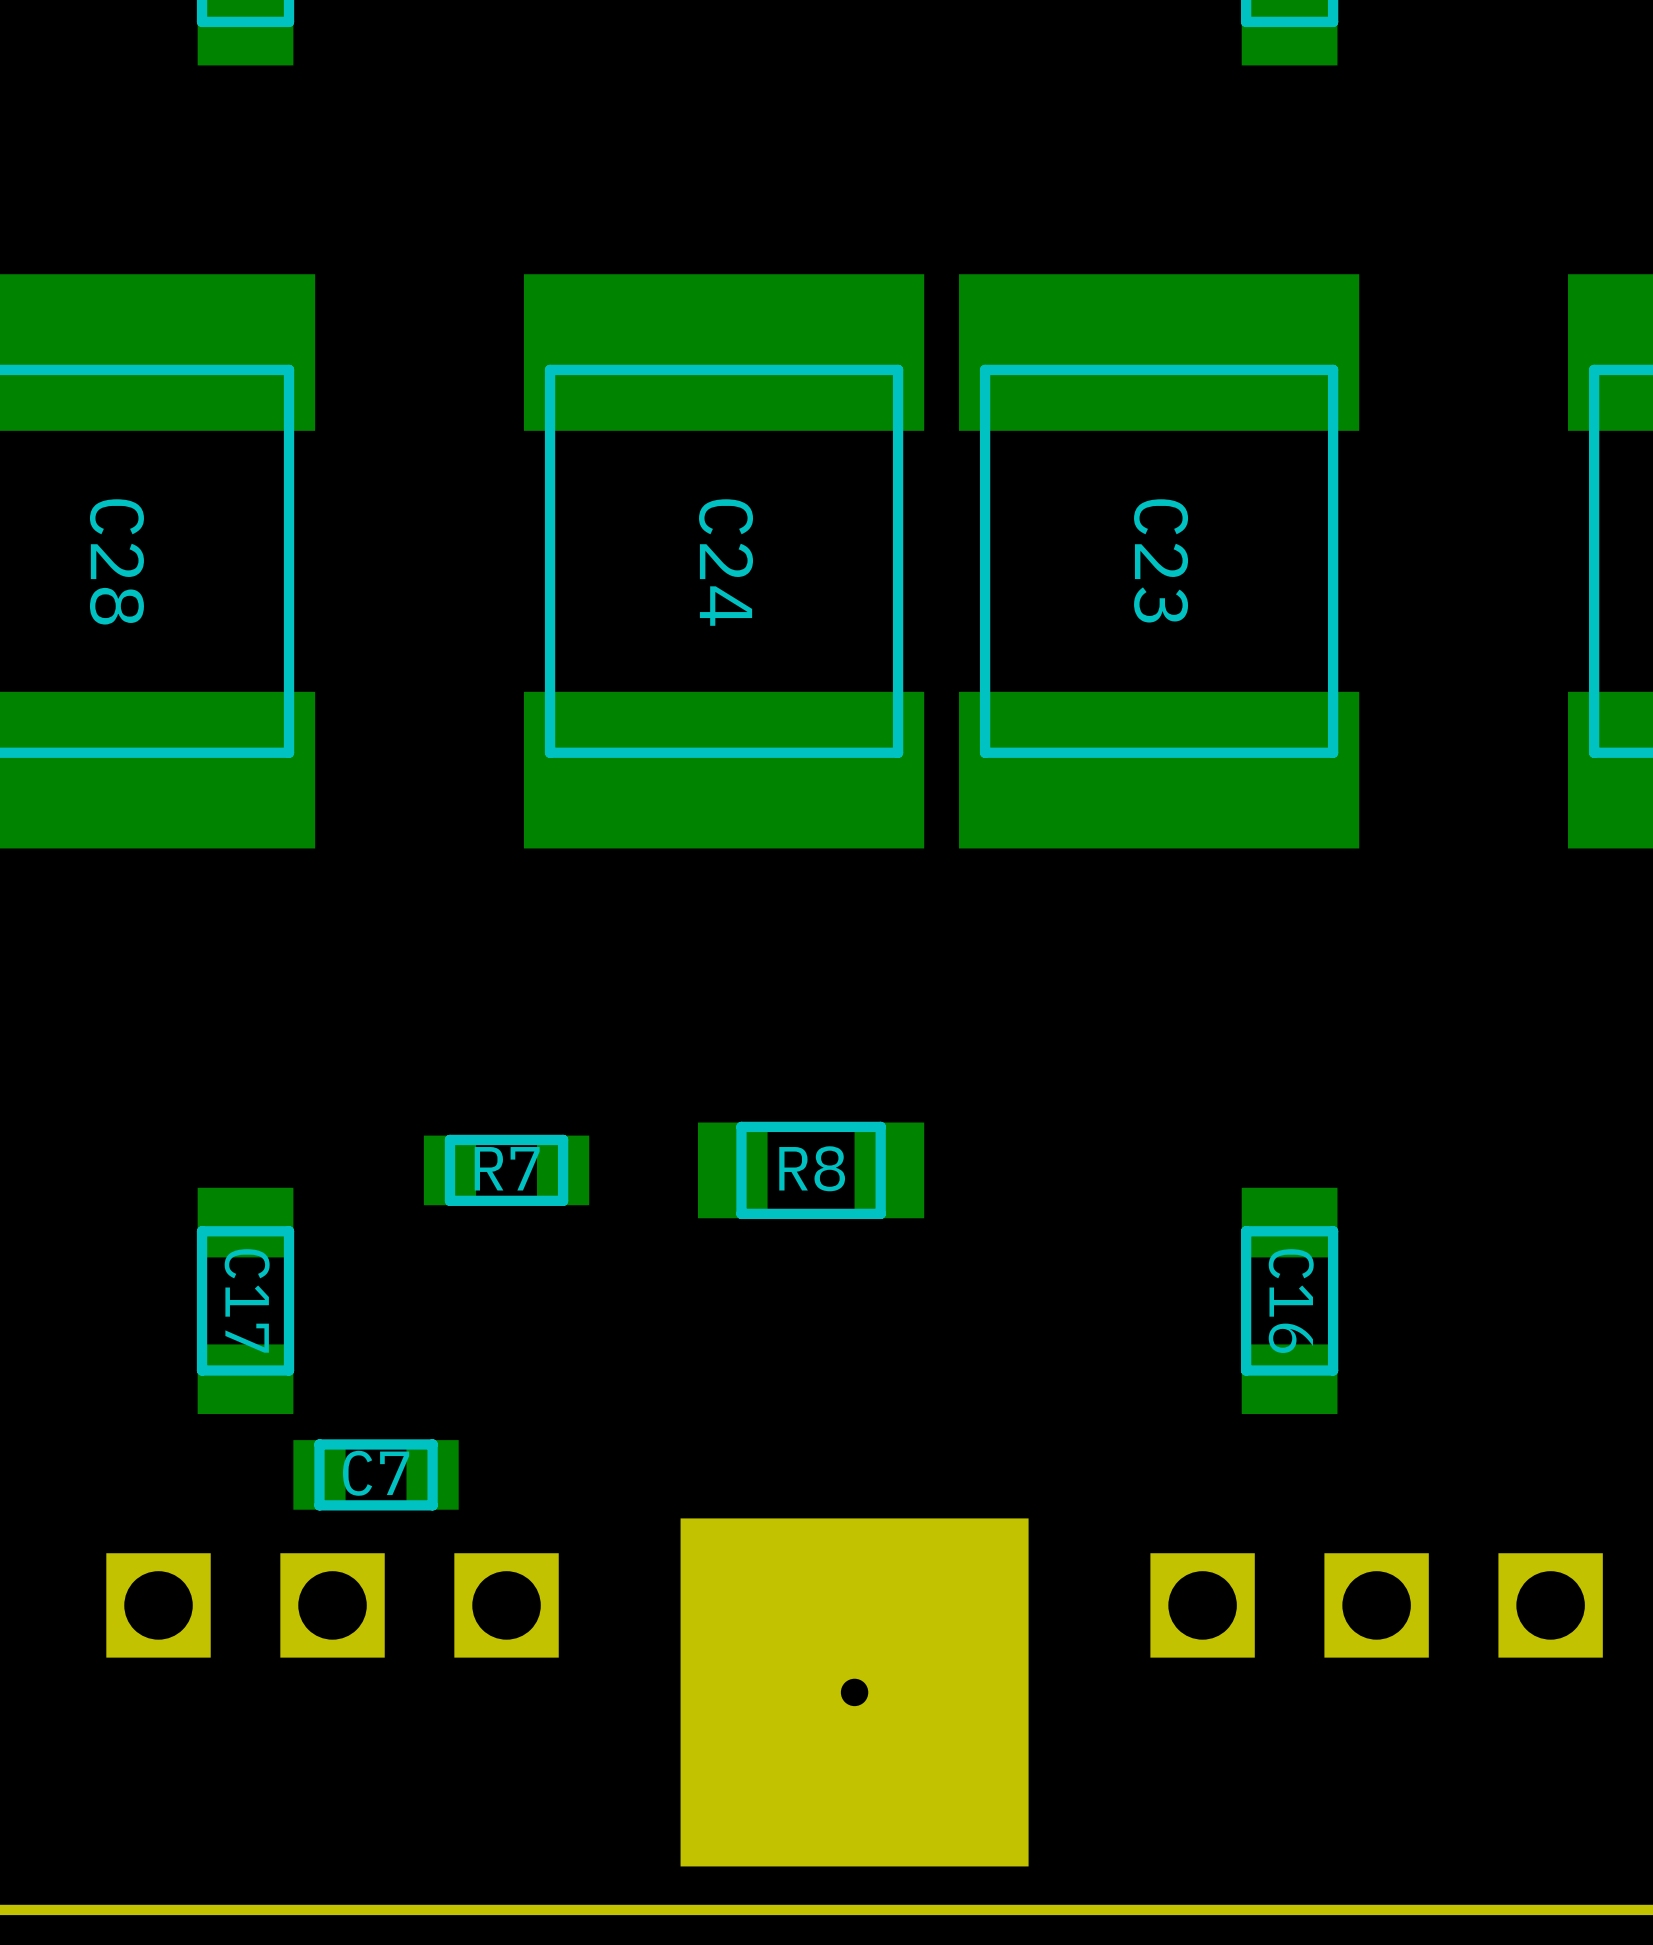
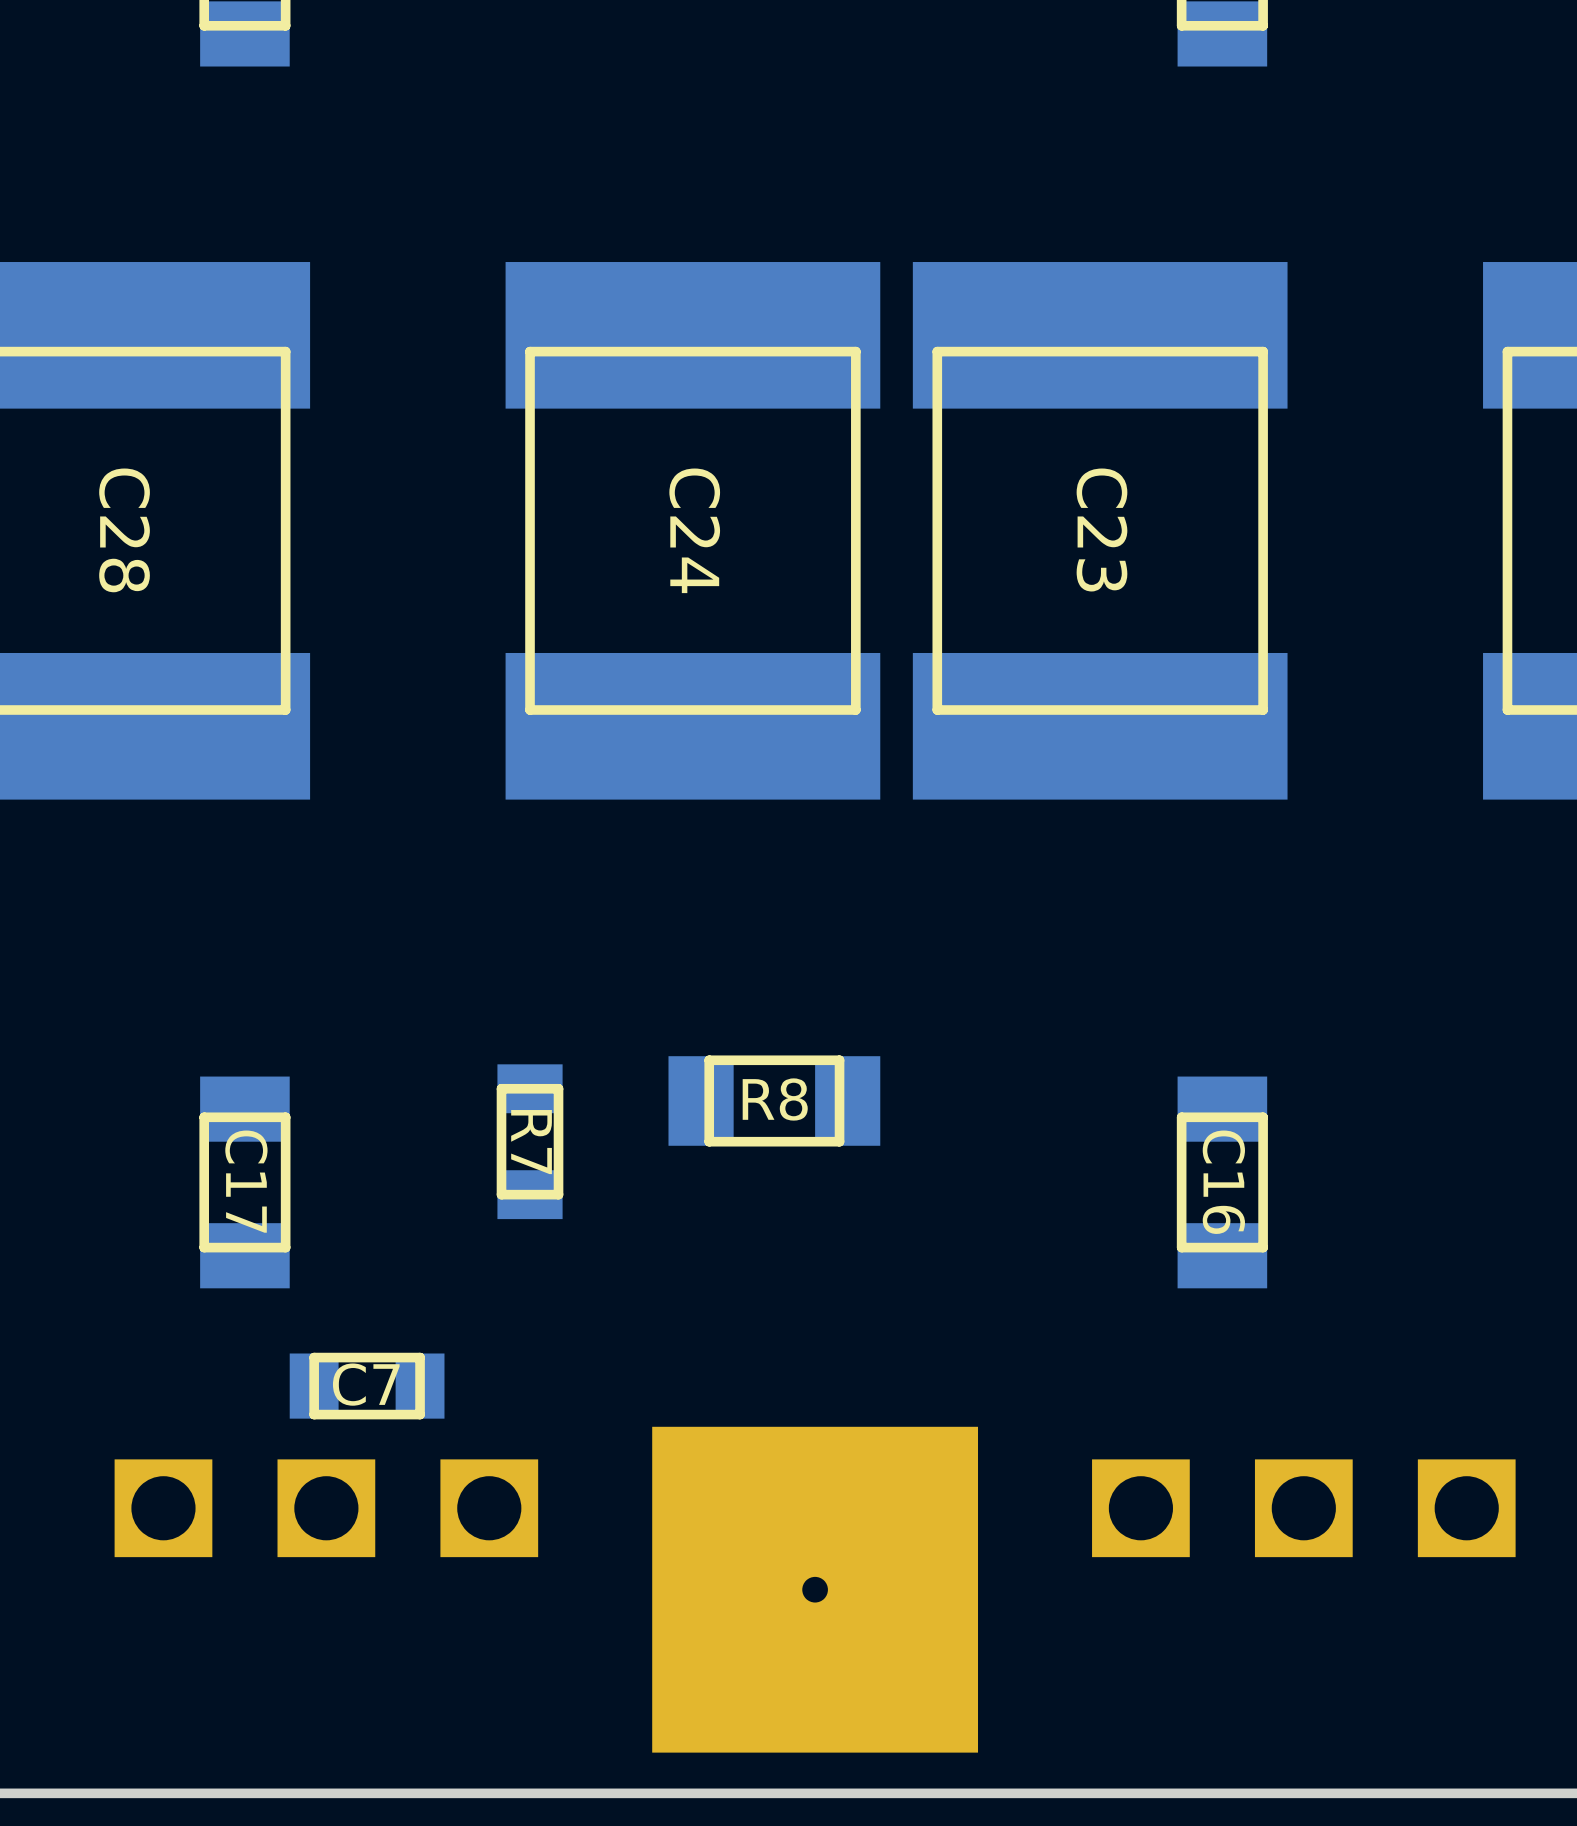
R7 rotation: 0° (506, 1170) -> 90° clockwise (530, 1141)
C17 position: (245, 1300) -> (244, 1182)
C16 position: (1289, 1300) -> (1222, 1182)

